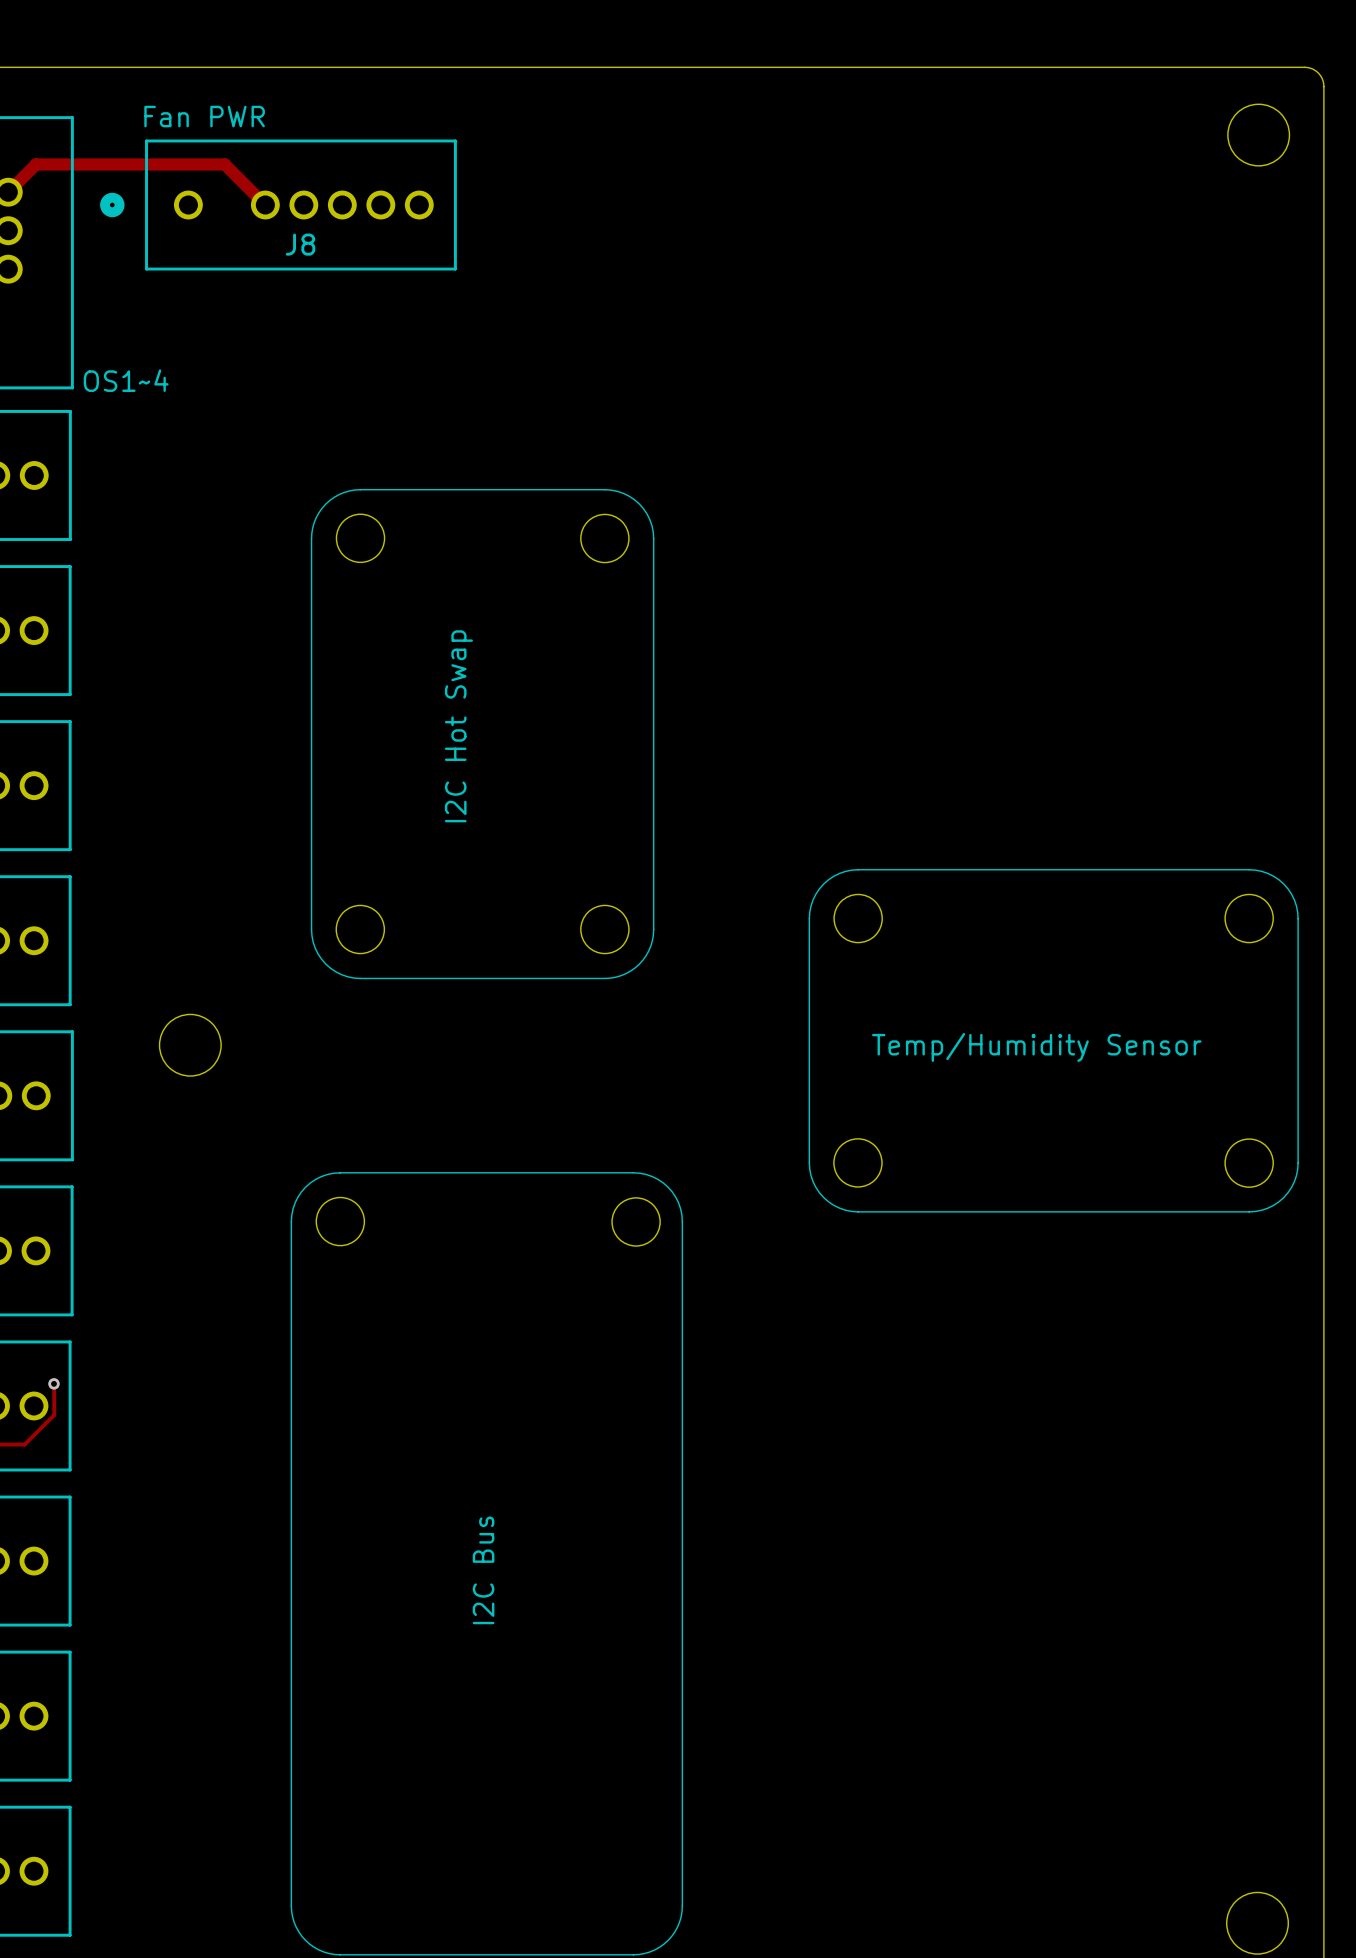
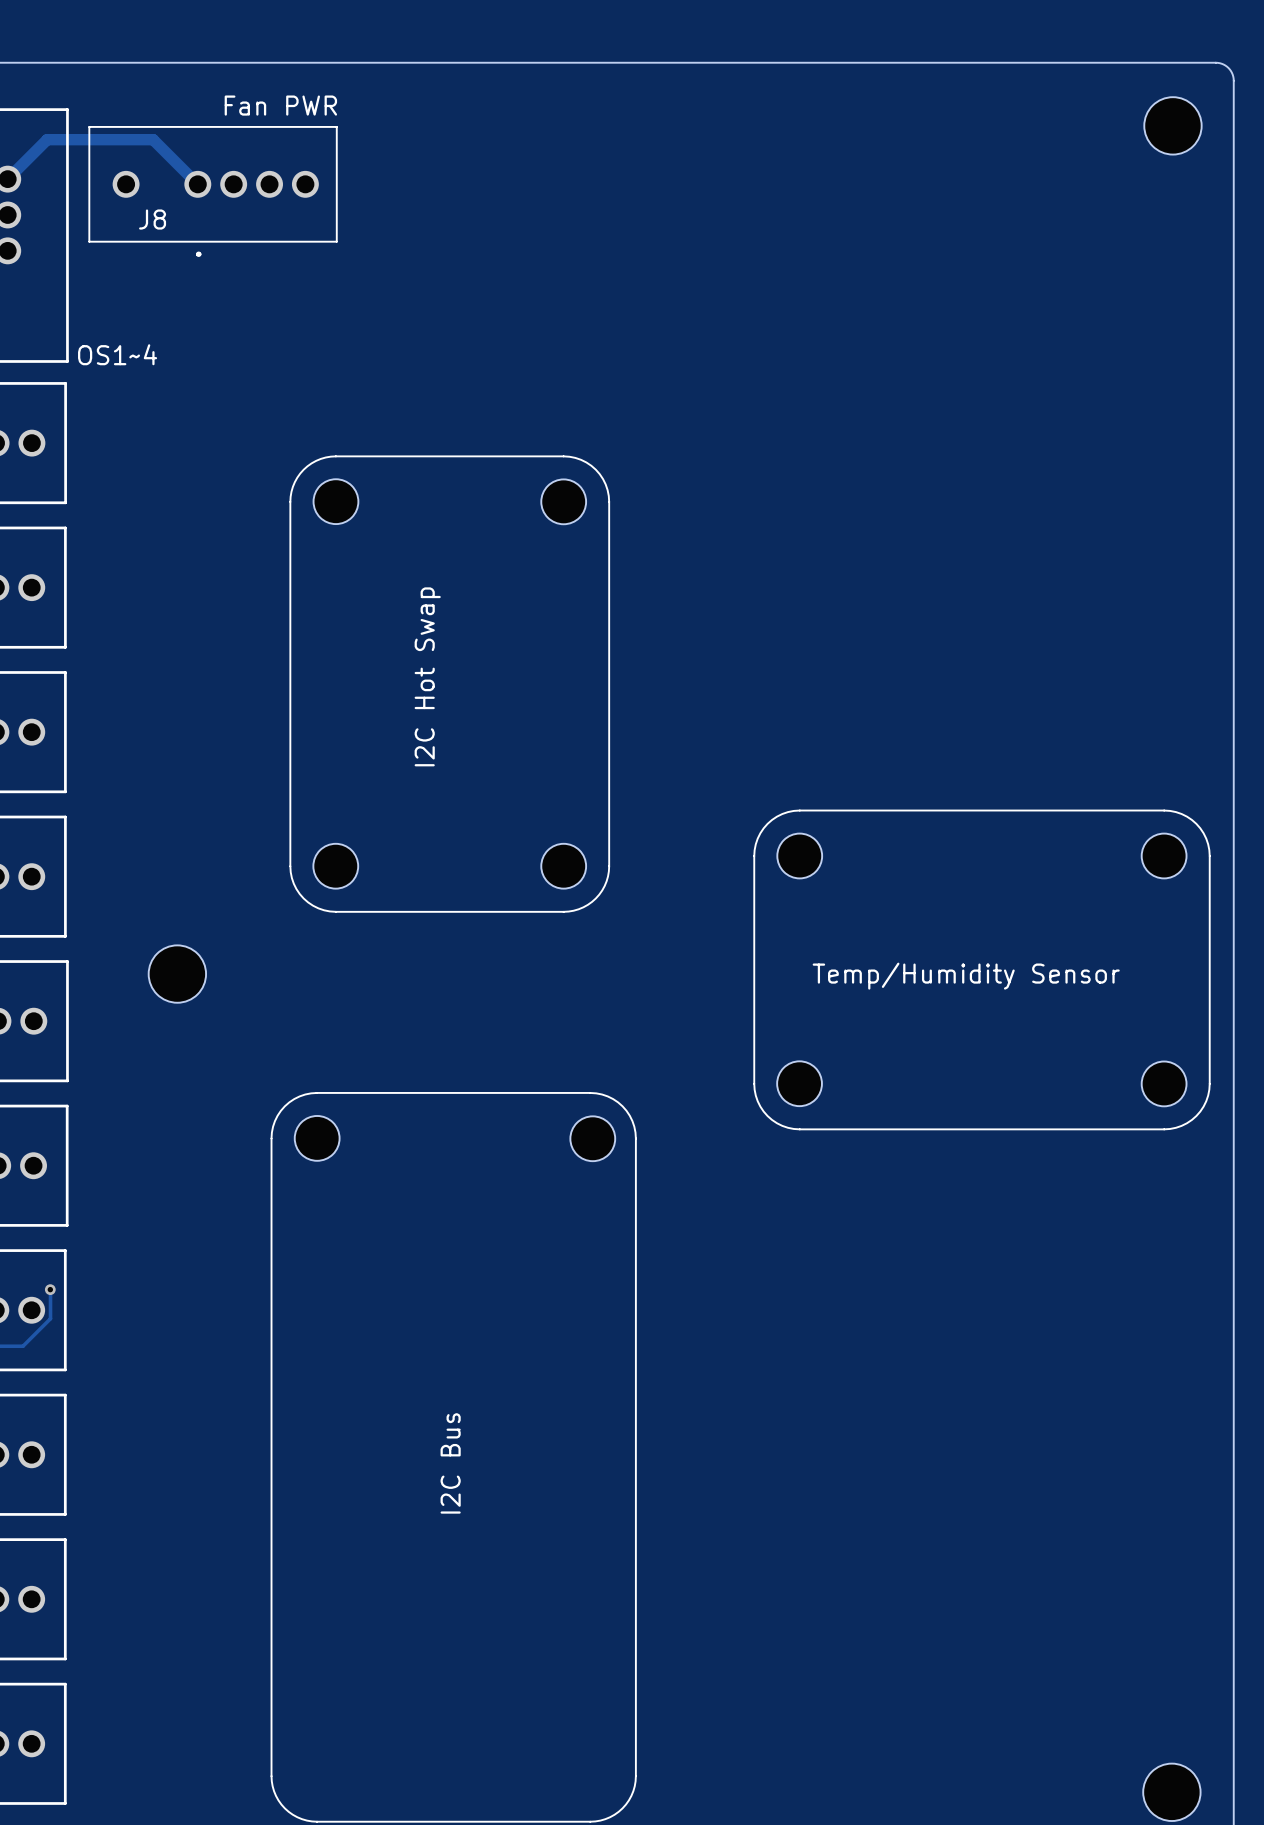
text position: Fan PWR (204, 116) -> Fan PWR (280, 105)
J8 footprint: [100, 139, 457, 271] -> [88, 126, 338, 257]
track: (36, 164) (224, 164) (265, 205) -> (33, 153) (47, 139) (153, 139) (197, 184)
J8 name position: J8 (300, 244) -> J8 (152, 219)

